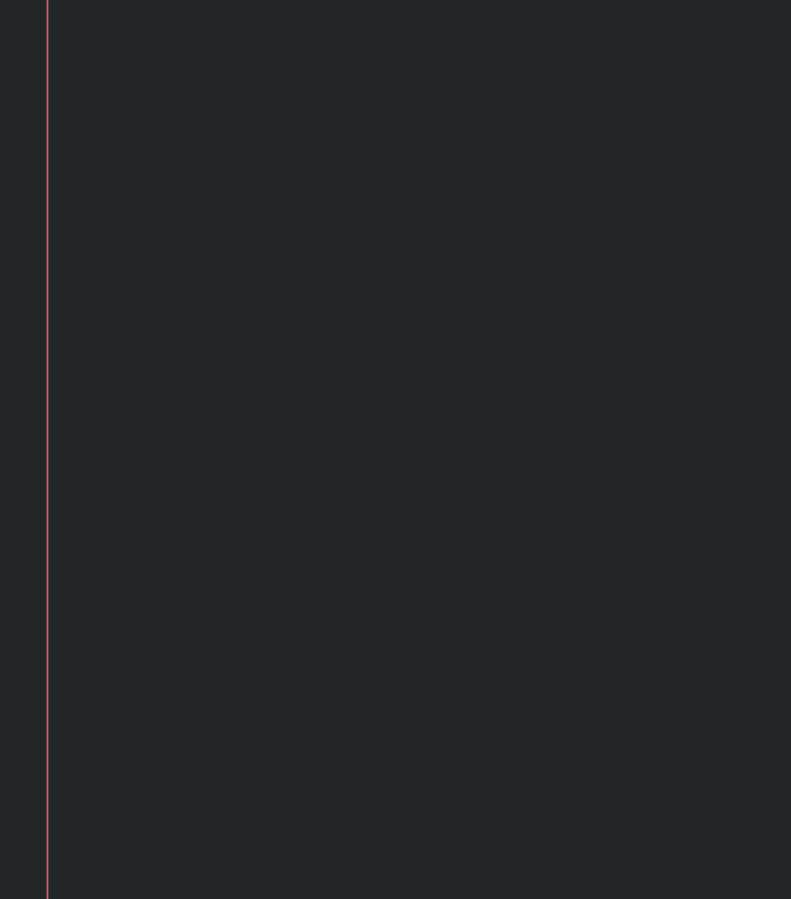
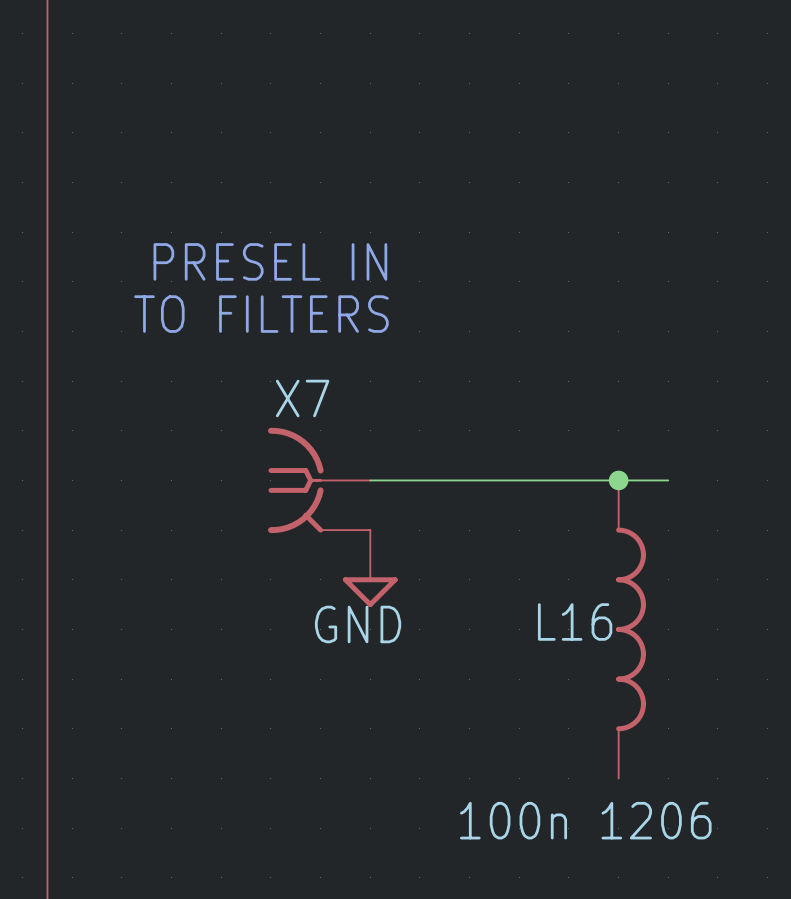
text: none -> PRESEL IN (270, 261)
text: none -> TO FILTERS (261, 314)
X7: none -> (319, 480)
wire: none -> (370, 480) (668, 480)
junction: none -> (618, 480)
power symbol: none -> GND (370, 568)
L16: none -> 100n 1206 (631, 629)

